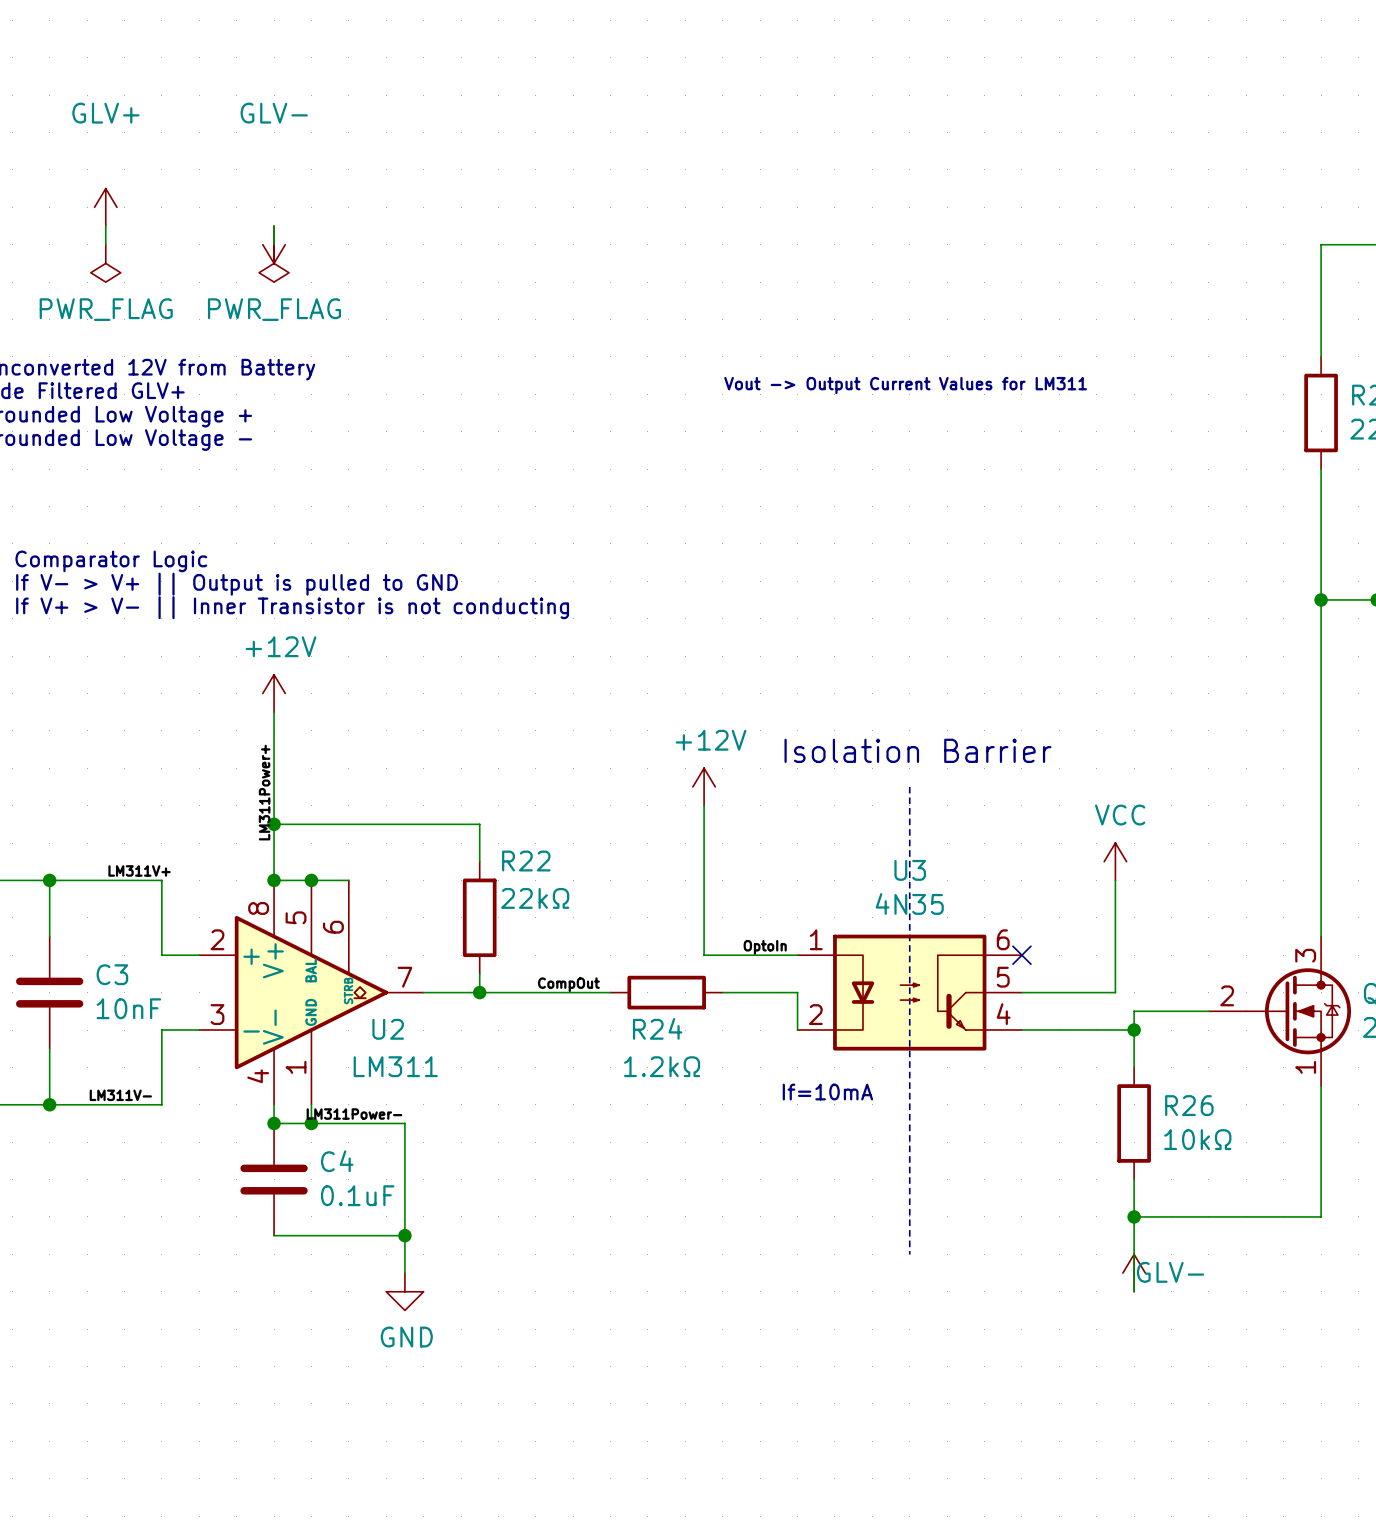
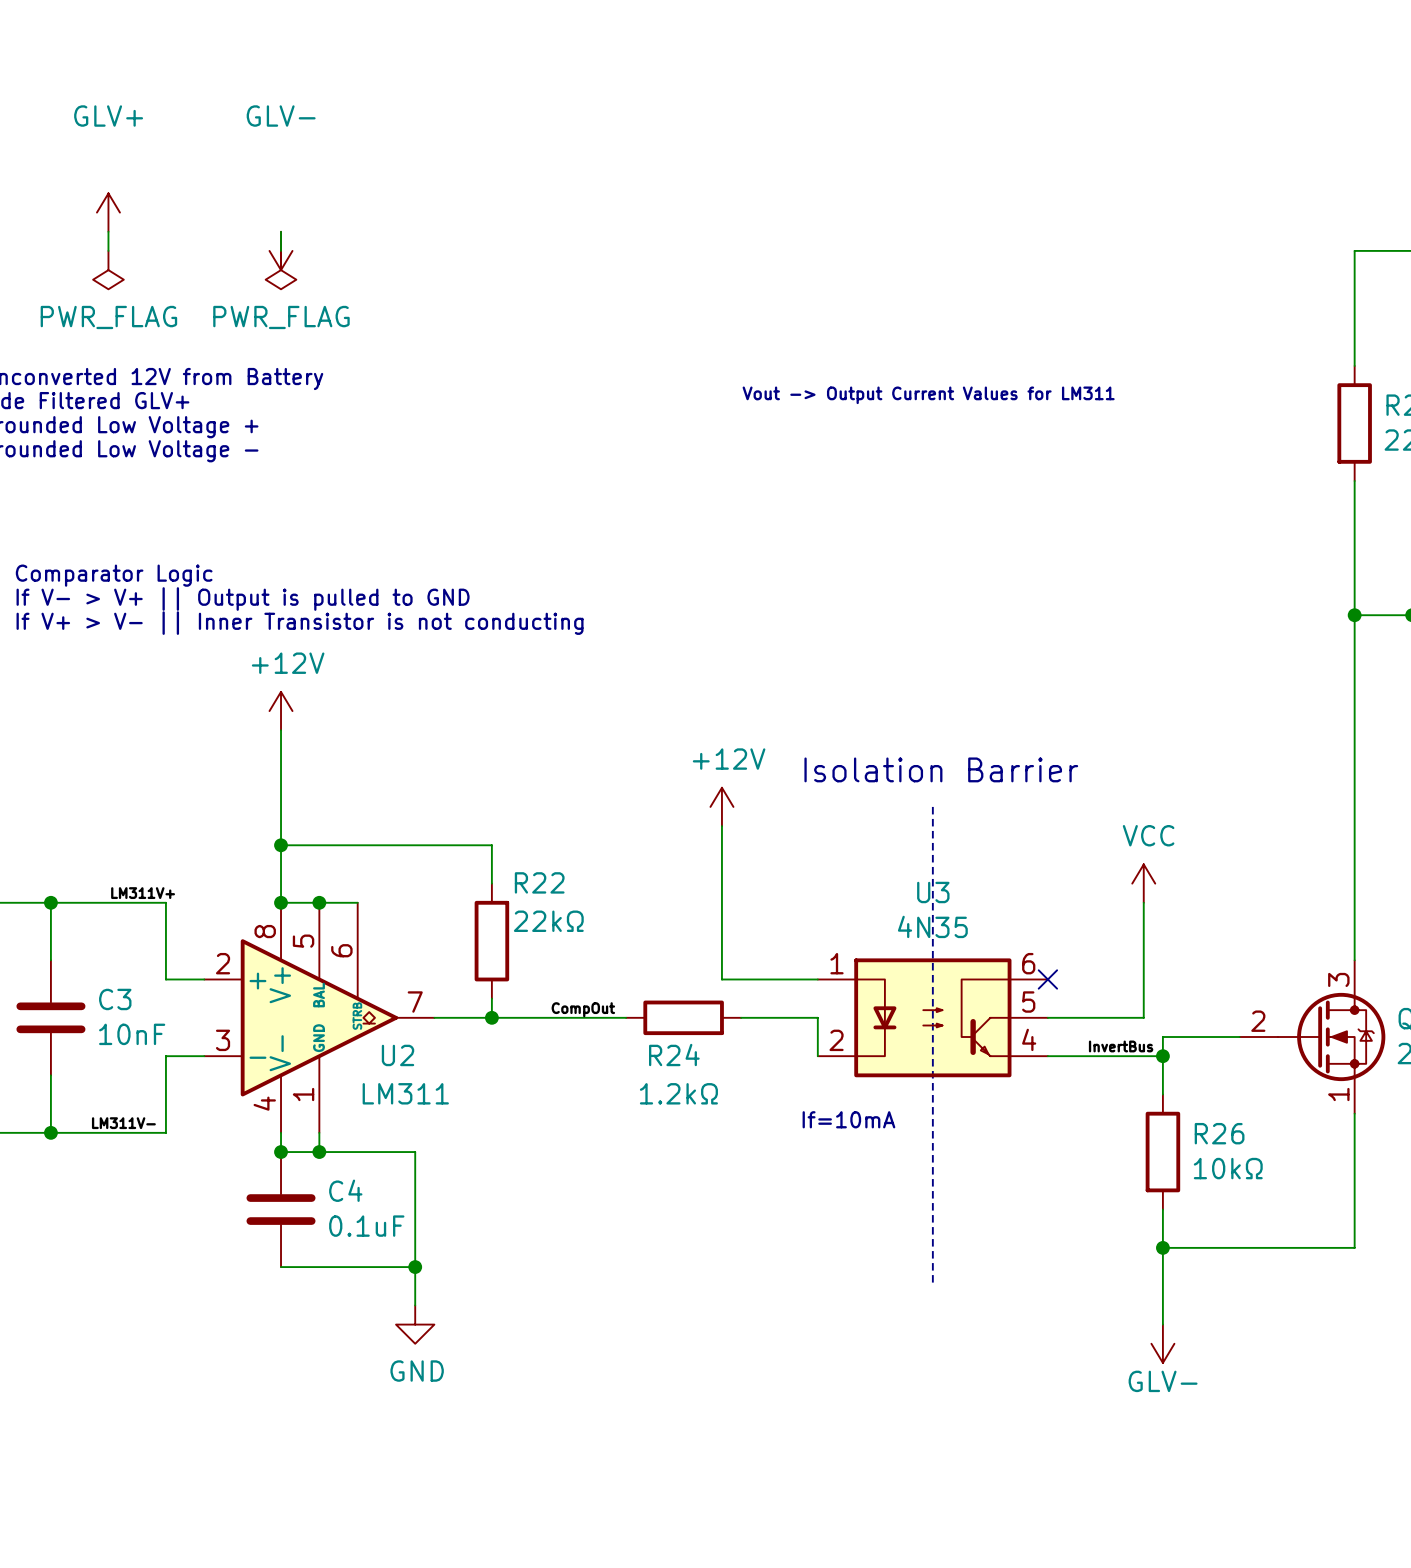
label: LM311Power+ (264, 792) -> none
label: OptoIn (765, 947) -> none
label: none -> InvertBus (1121, 1046)
label: LM311Power- (354, 1114) -> none
power symbol text position: GLV- (1170, 1272) -> GLV- (1163, 1381)
power symbol rotation: 0° (1134, 1273) -> 180° (1162, 1343)
power symbol position: GLV- (1134, 1273) -> GLV- (1162, 1343)

